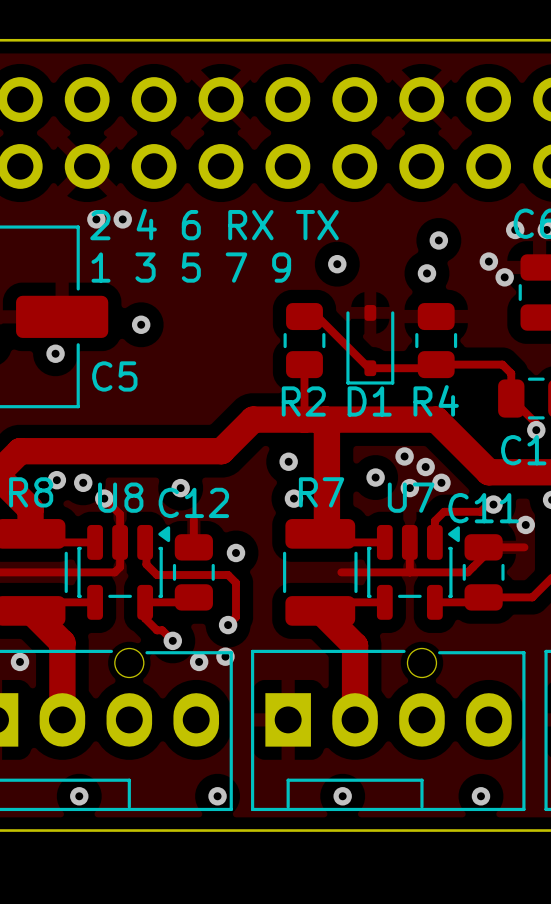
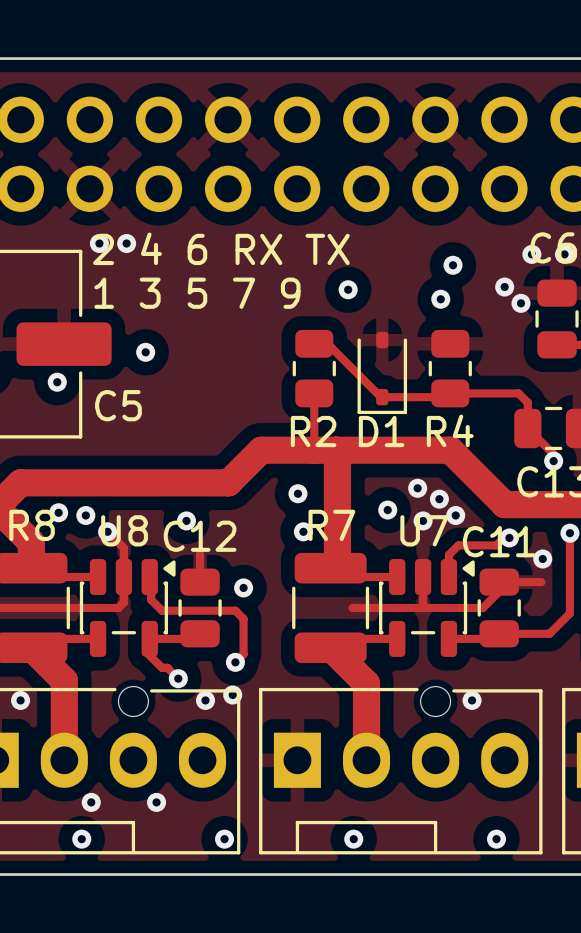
via: none -> (472, 700)
via: none -> (91, 802)
via: none -> (156, 802)

